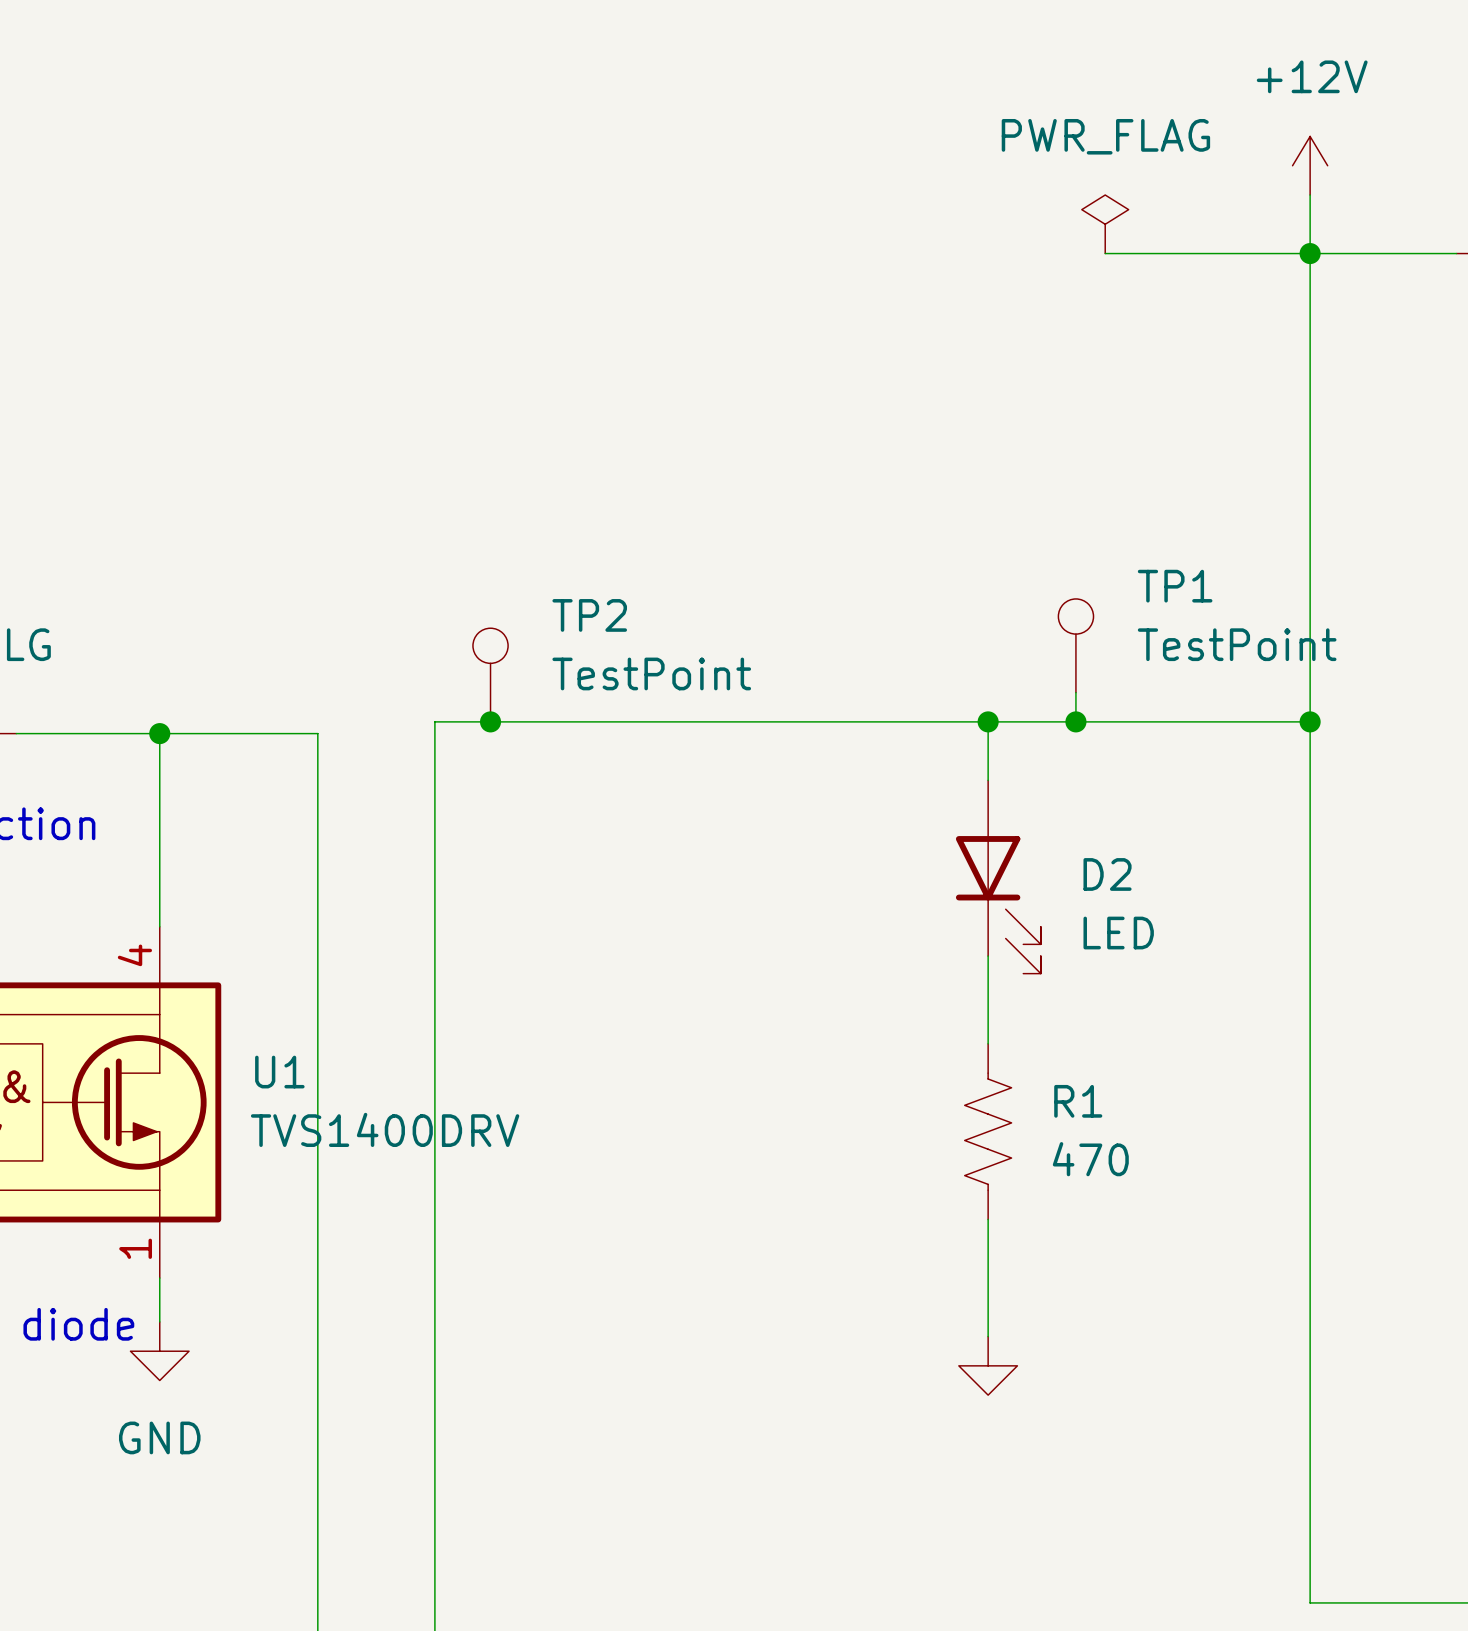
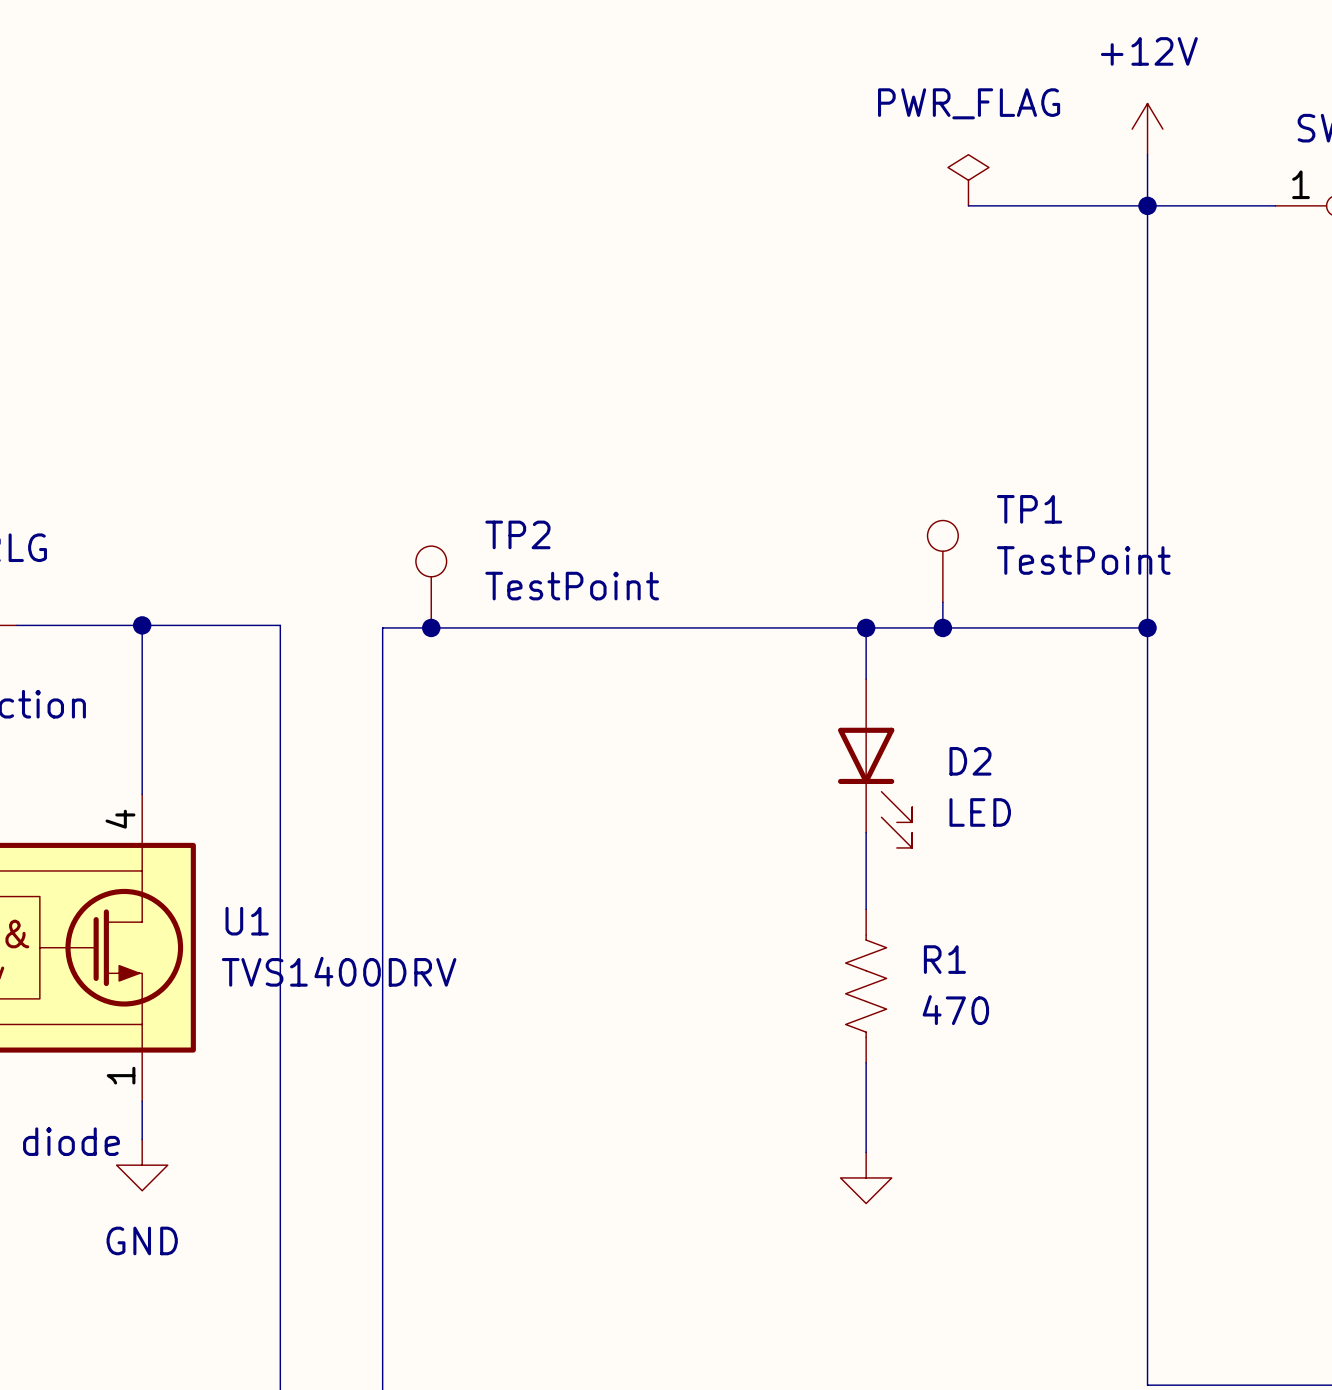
TP1 position: (1075, 645) -> (942, 561)
TP2 position: (490, 675) -> (431, 587)
junction position: (490, 721) -> (431, 627)
junction position: (988, 721) -> (866, 627)
junction position: (1075, 721) -> (942, 627)
wire: (1310, 721) (434, 721) (434, 736) -> (1147, 627) (382, 627)
junction position: (1310, 721) -> (1147, 627)
D2 position: (998, 877) -> (875, 763)
R1 position: (988, 1131) -> (866, 986)

